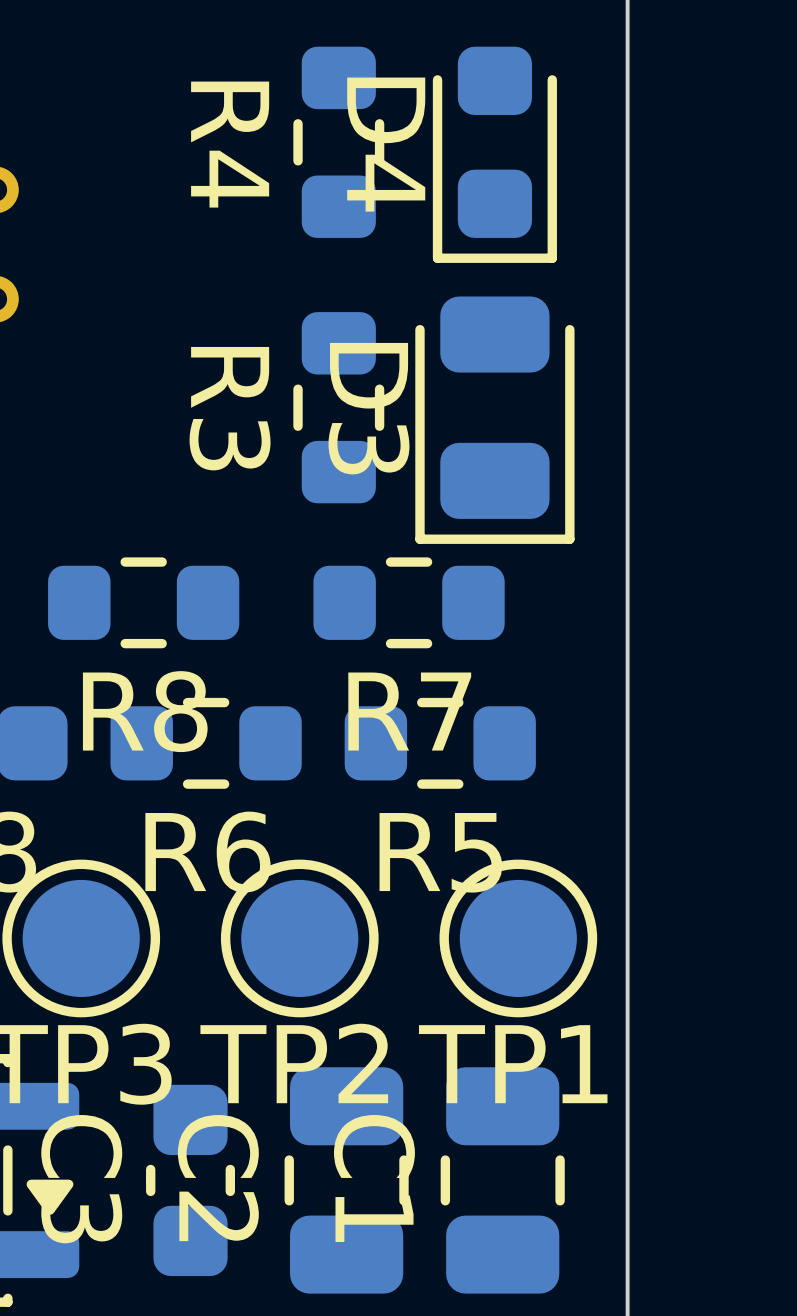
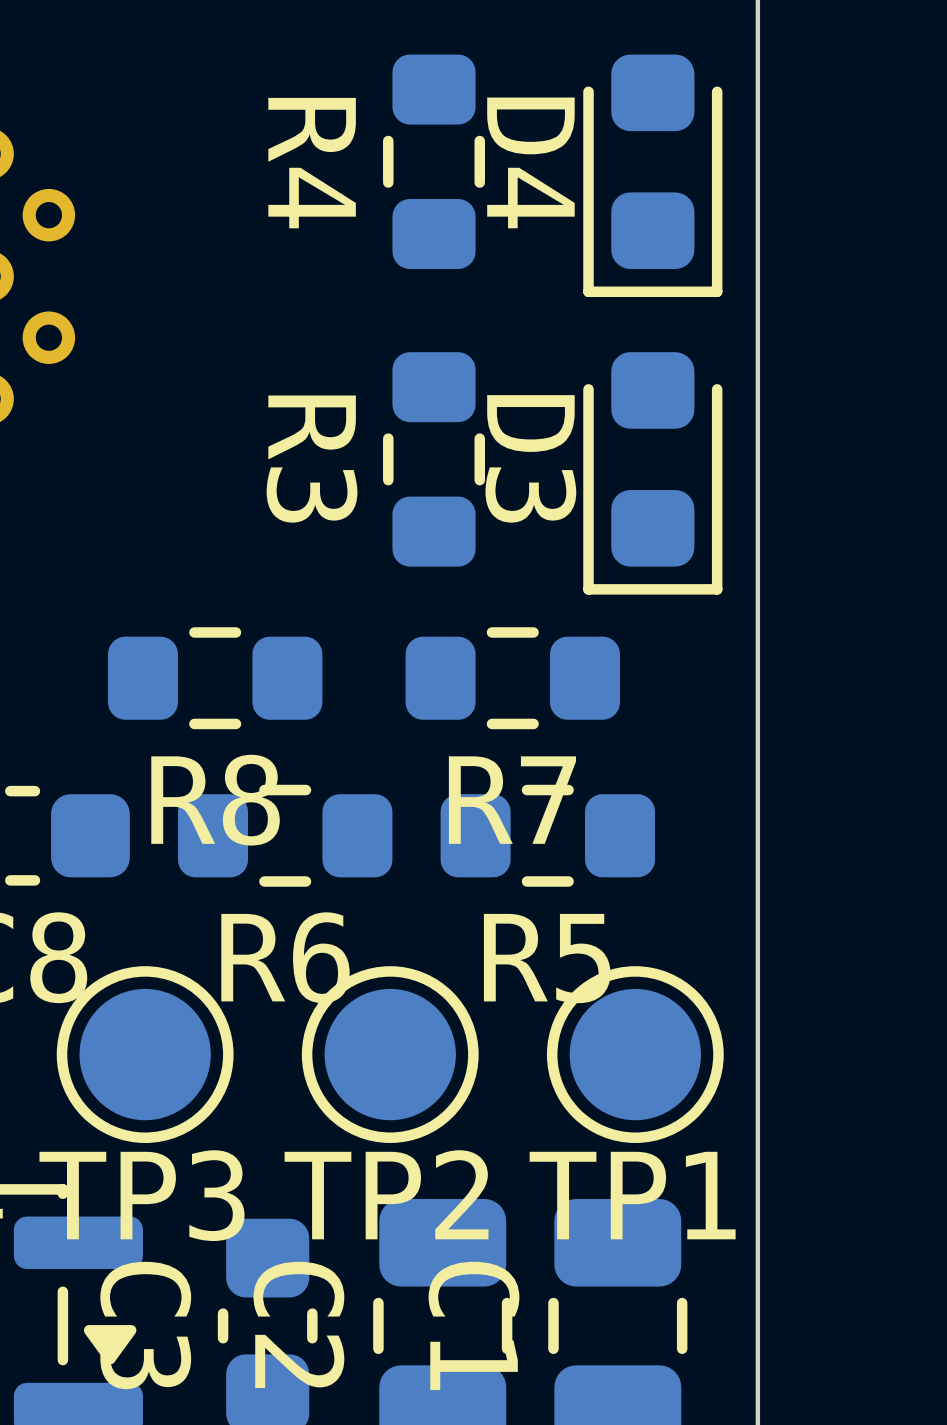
D4 position: (494, 154) -> (652, 175)
D3 footprint: [415, 296, 575, 544] -> [583, 352, 723, 595]
D3 name position: D3 (368, 408) -> D3 (530, 458)

